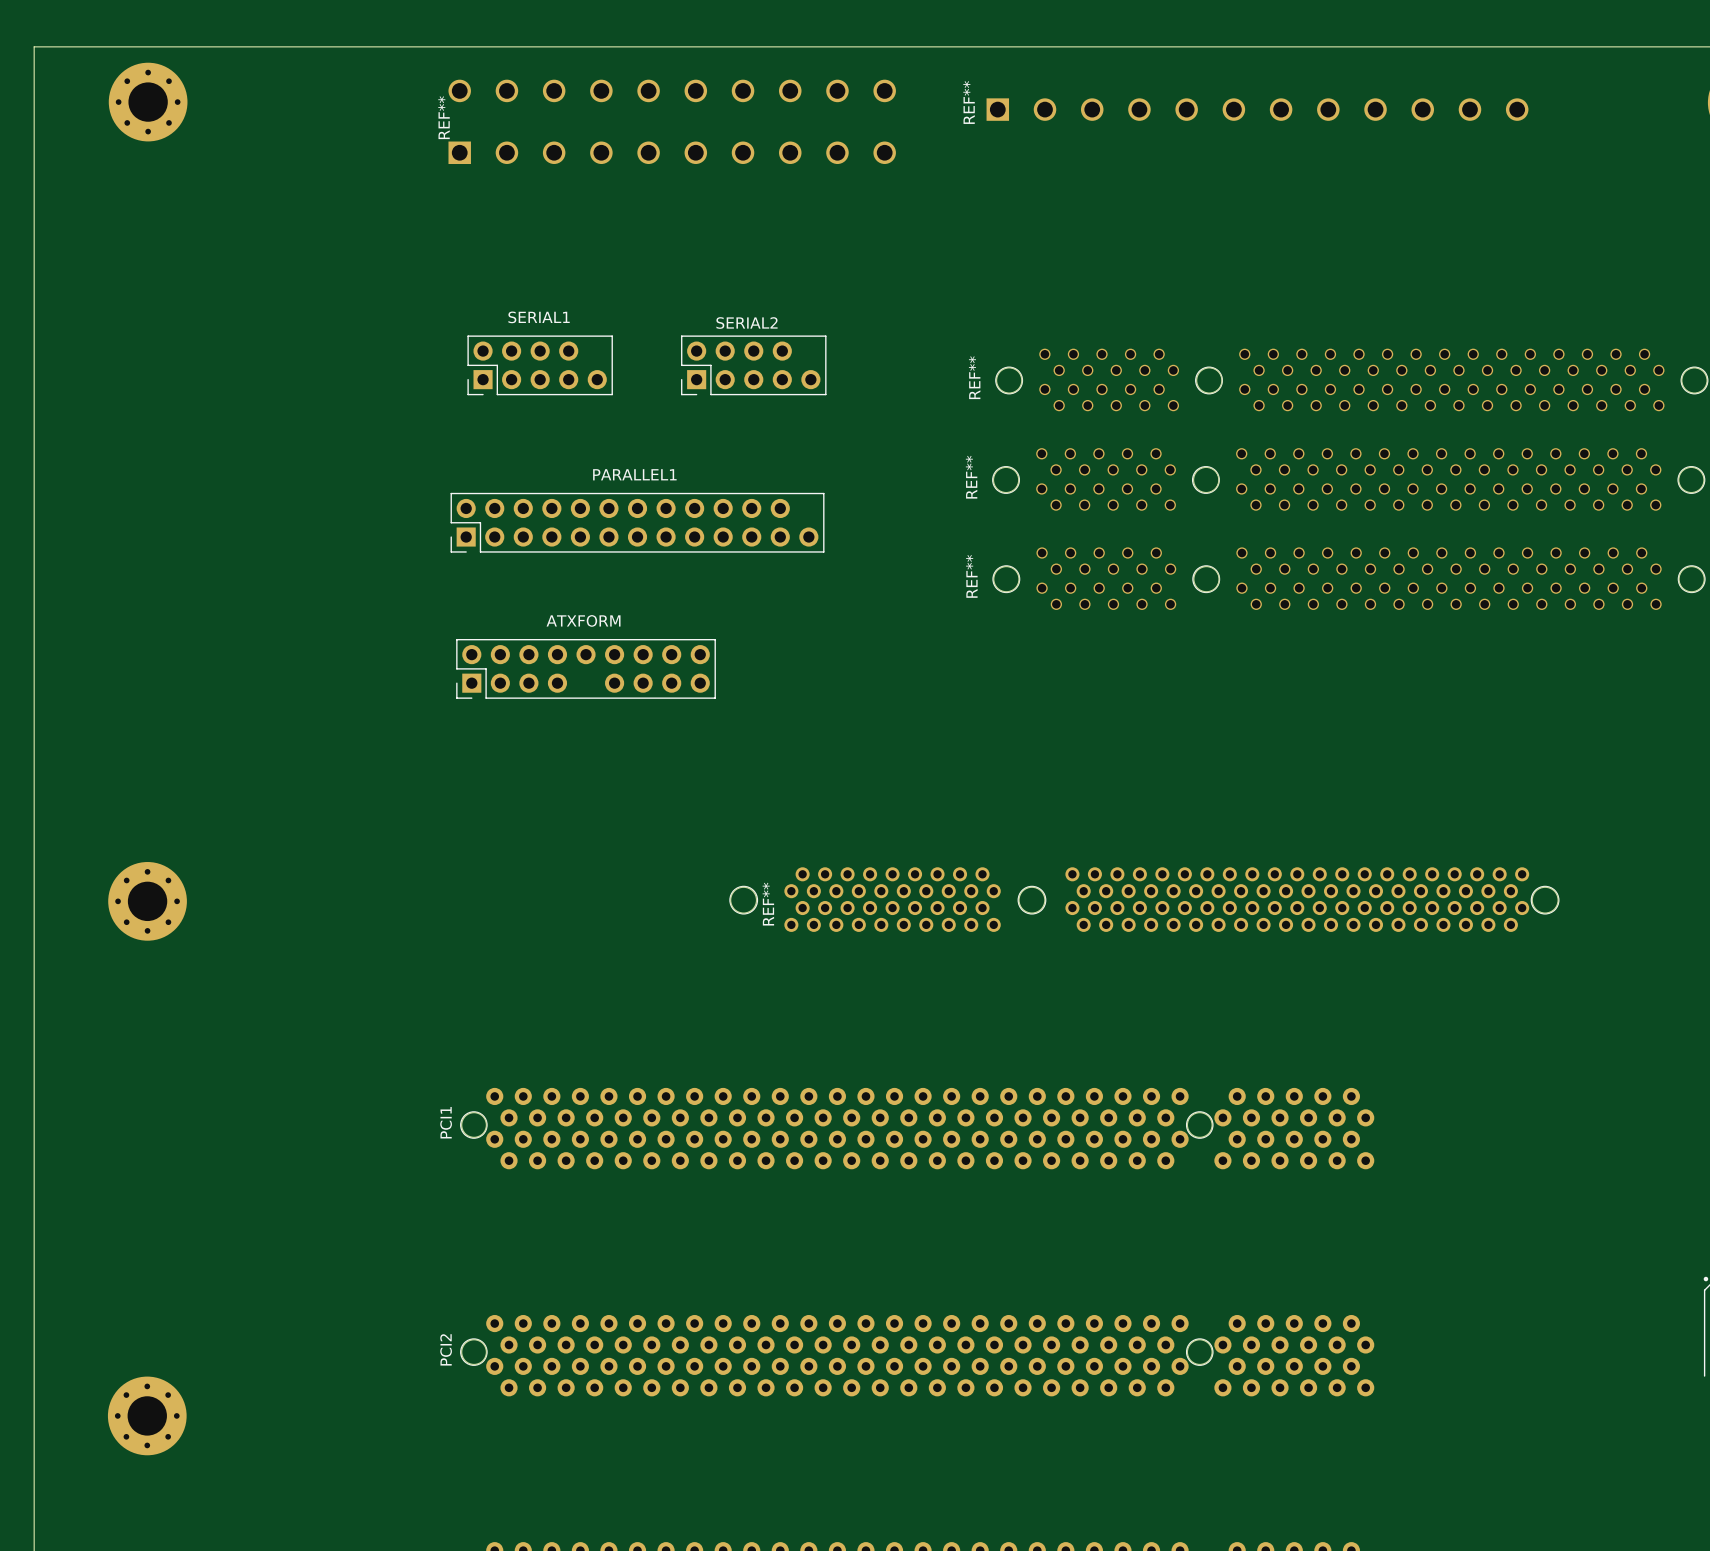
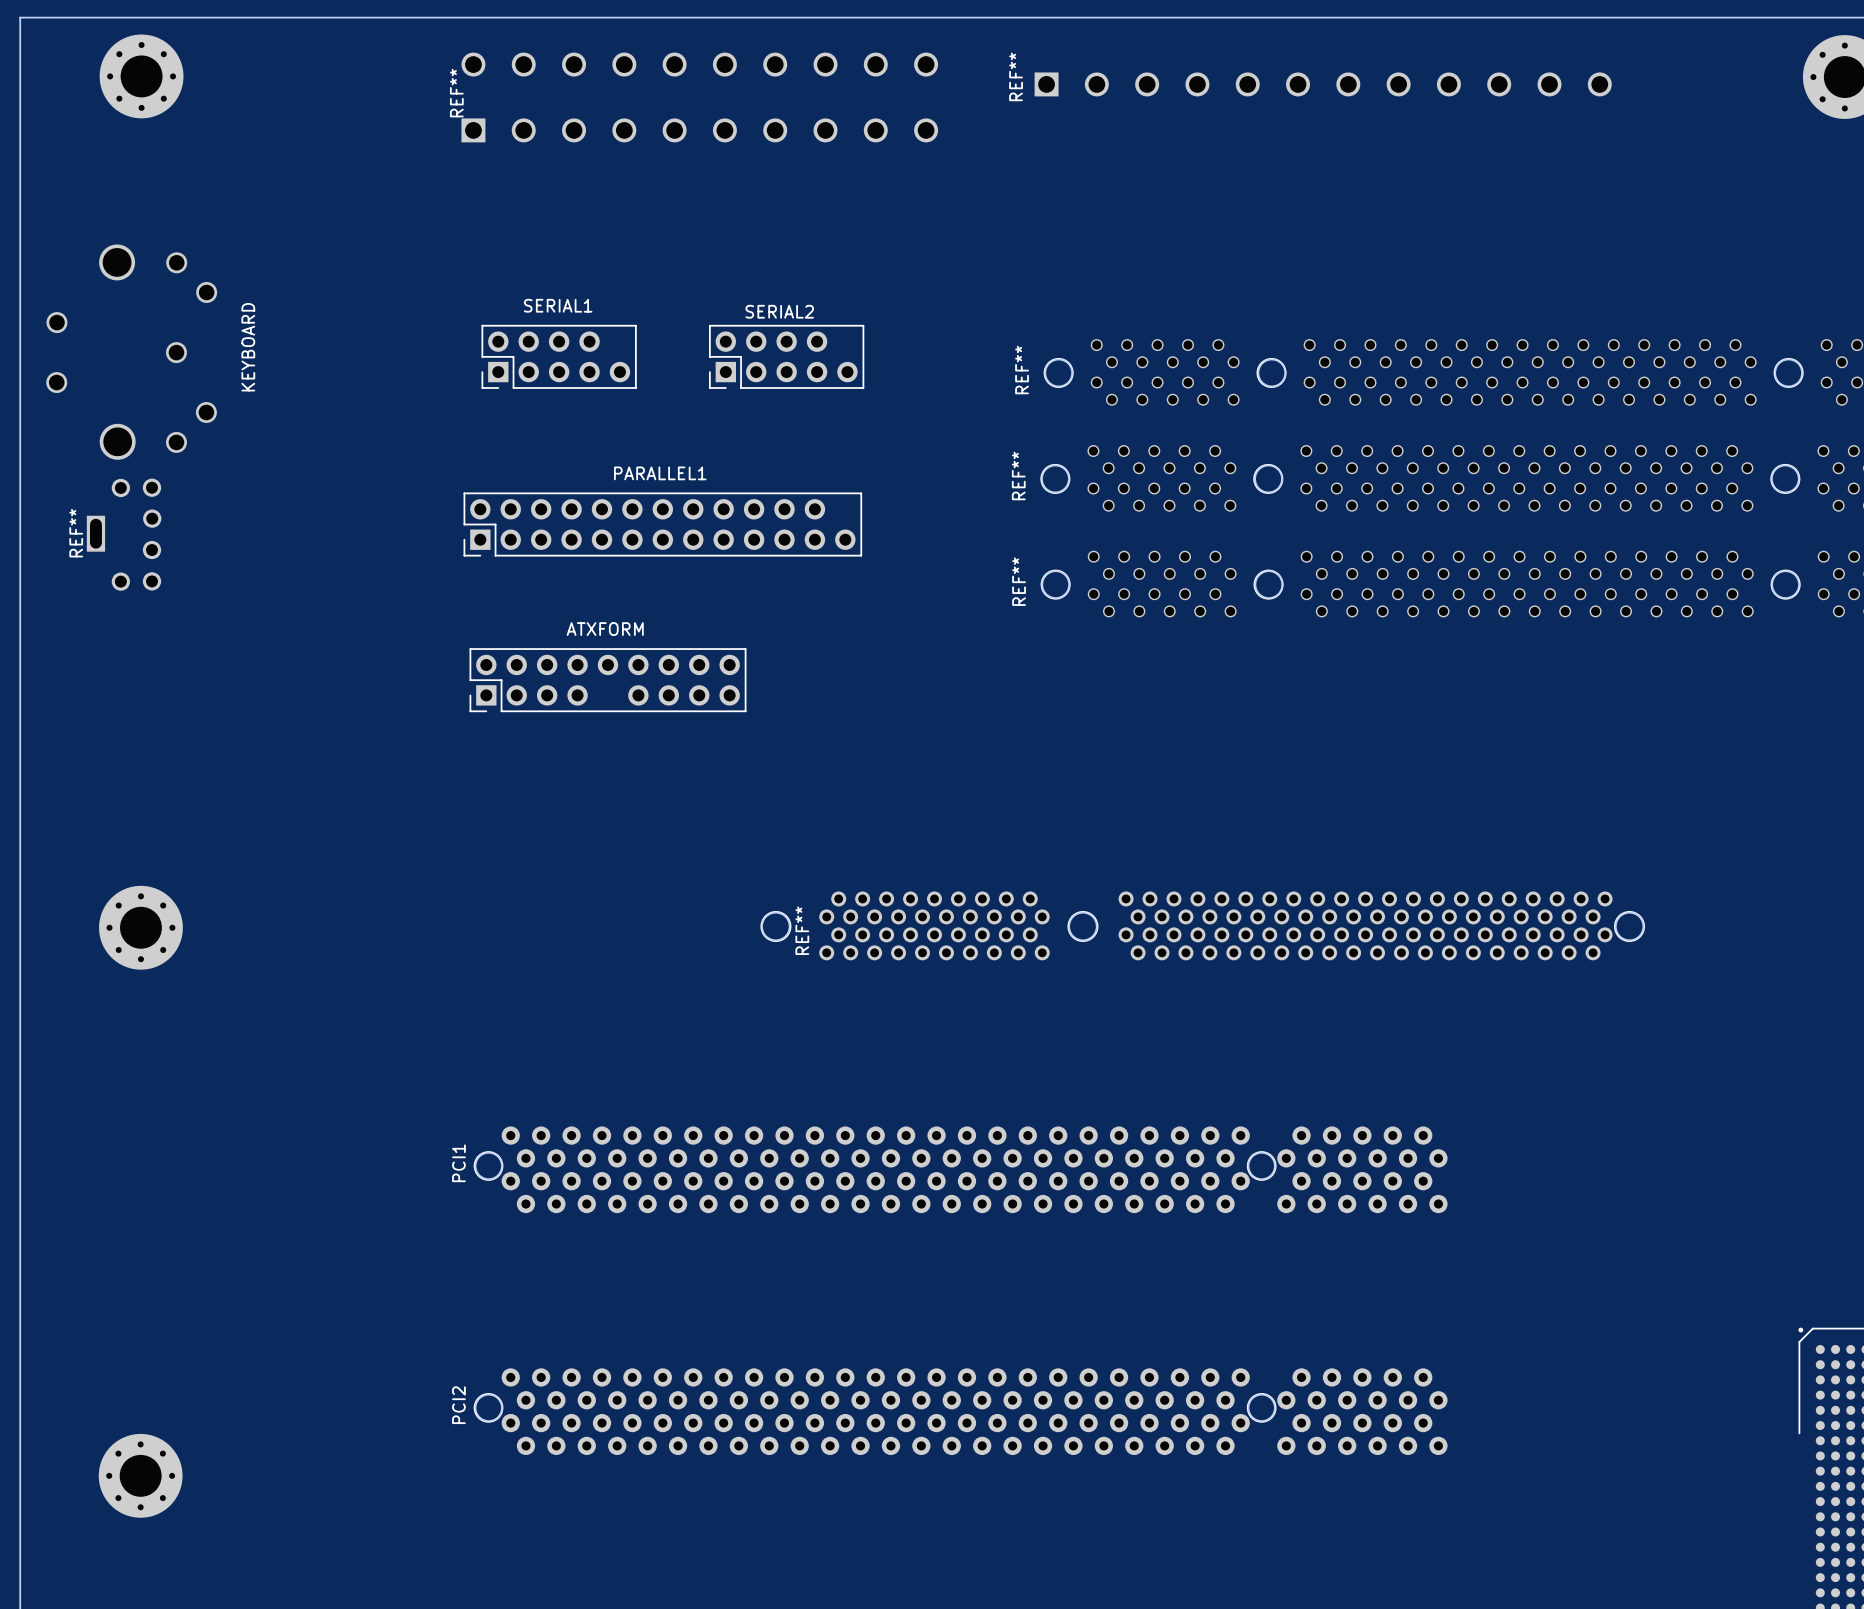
KEYBOARD: none -> (131, 352)
REF**: none -> (124, 534)

